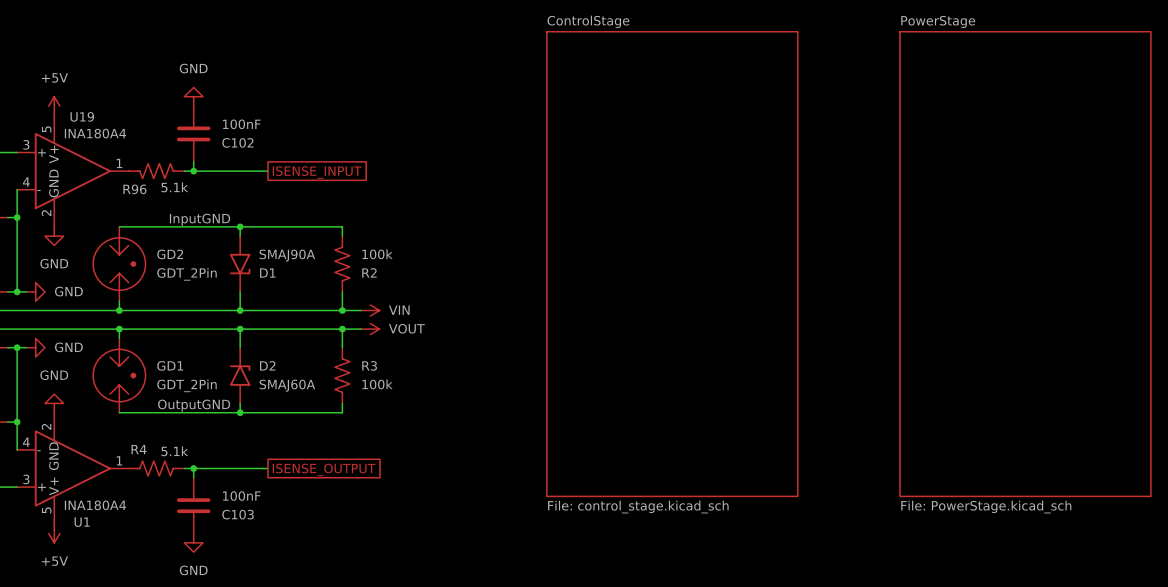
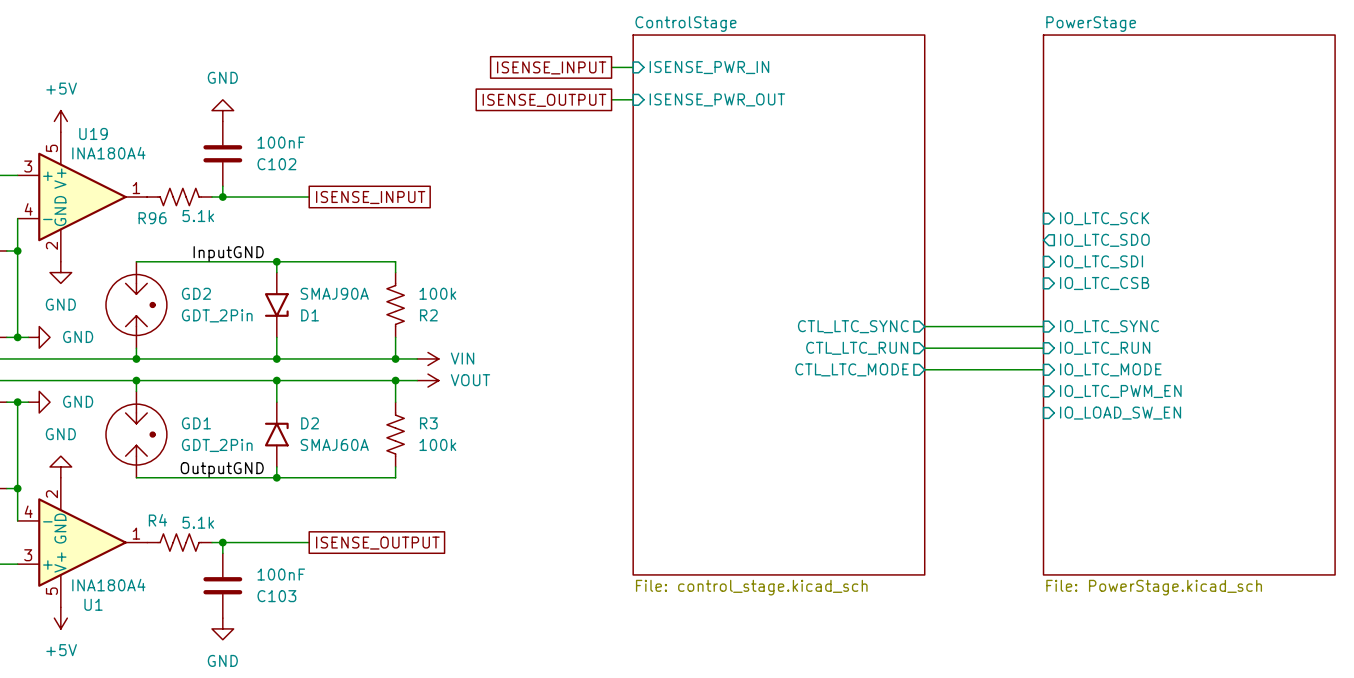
wire: none -> (611, 67) (633, 67)
sheet pin: none -> ISENSE_PWR_IN (709, 67)
global label: none -> ISENSE_INPUT (551, 67)
wire: none -> (611, 99) (633, 99)
global label: none -> ISENSE_OUTPUT (544, 100)
sheet pin: none -> ISENSE_PWR_OUT (717, 99)
sheet pin: none -> IO_LTC_SCK (1104, 218)
sheet pin: none -> IO_LTC_SDO (1104, 240)
sheet pin: none -> IO_LTC_SDI (1101, 261)
sheet pin: none -> IO_LTC_CSB (1104, 283)
wire: none -> (924, 326) (1043, 326)
sheet pin: none -> CTL_LTC_SYNC (853, 326)
sheet pin: none -> IO_LTC_SYNC (1109, 326)
wire: none -> (924, 348) (1043, 348)
sheet pin: none -> CTL_LTC_RUN (857, 348)
sheet pin: none -> IO_LTC_RUN (1105, 348)
wire: none -> (924, 369) (1043, 369)
sheet pin: none -> CTL_LTC_MODE (852, 369)
sheet pin: none -> IO_LTC_MODE (1110, 369)
sheet pin: none -> IO_LTC_PWM_EN (1120, 391)
sheet pin: none -> IO_LOAD_SW_EN (1120, 413)

